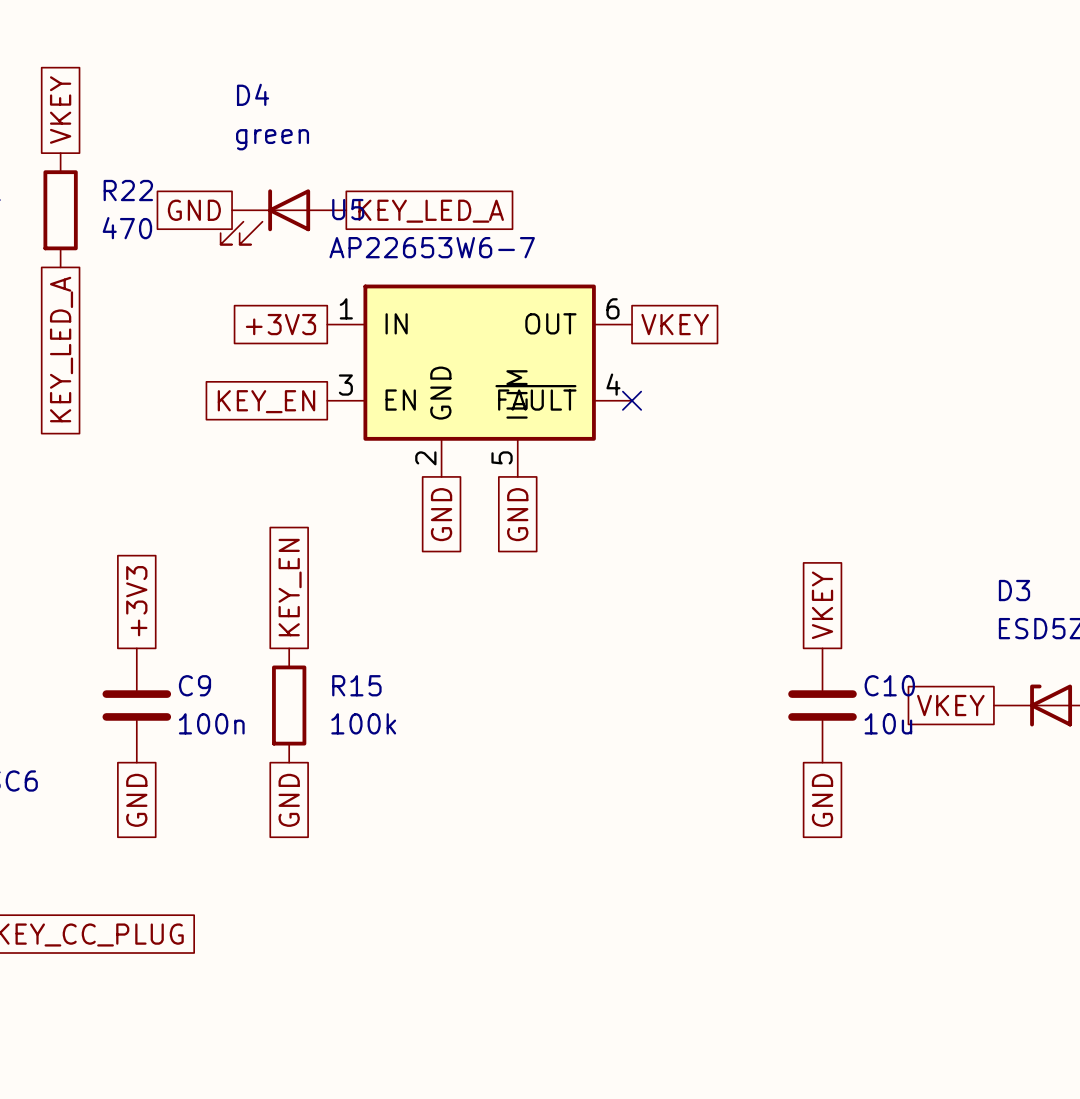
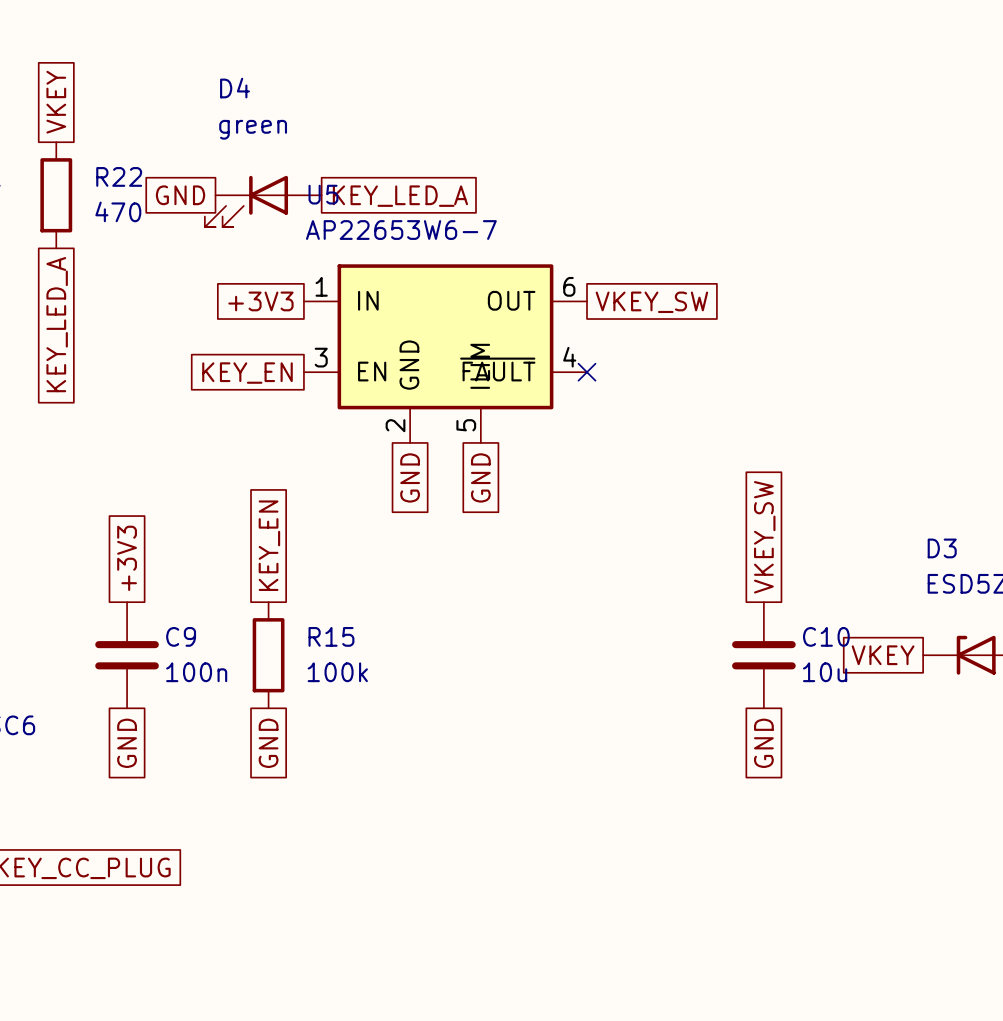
global label: VKEY (675, 324) -> VKEY_SW (651, 302)
global label: VKEY (822, 605) -> VKEY_SW (764, 537)

